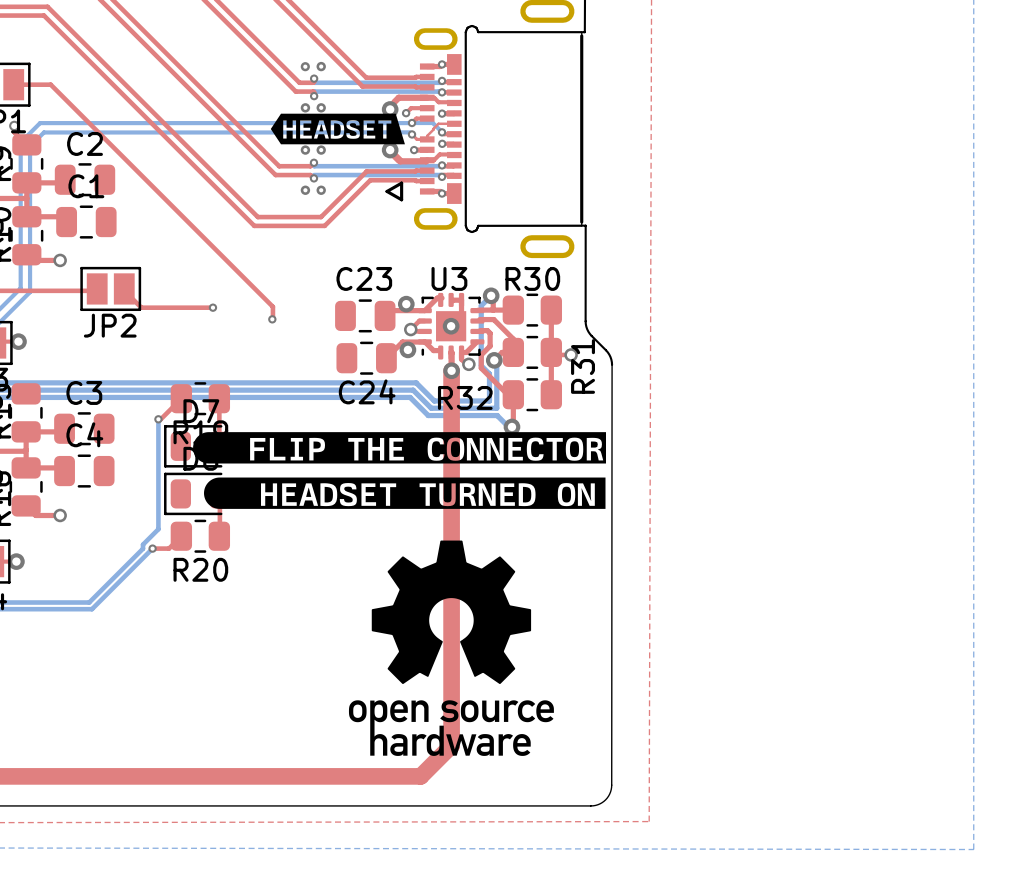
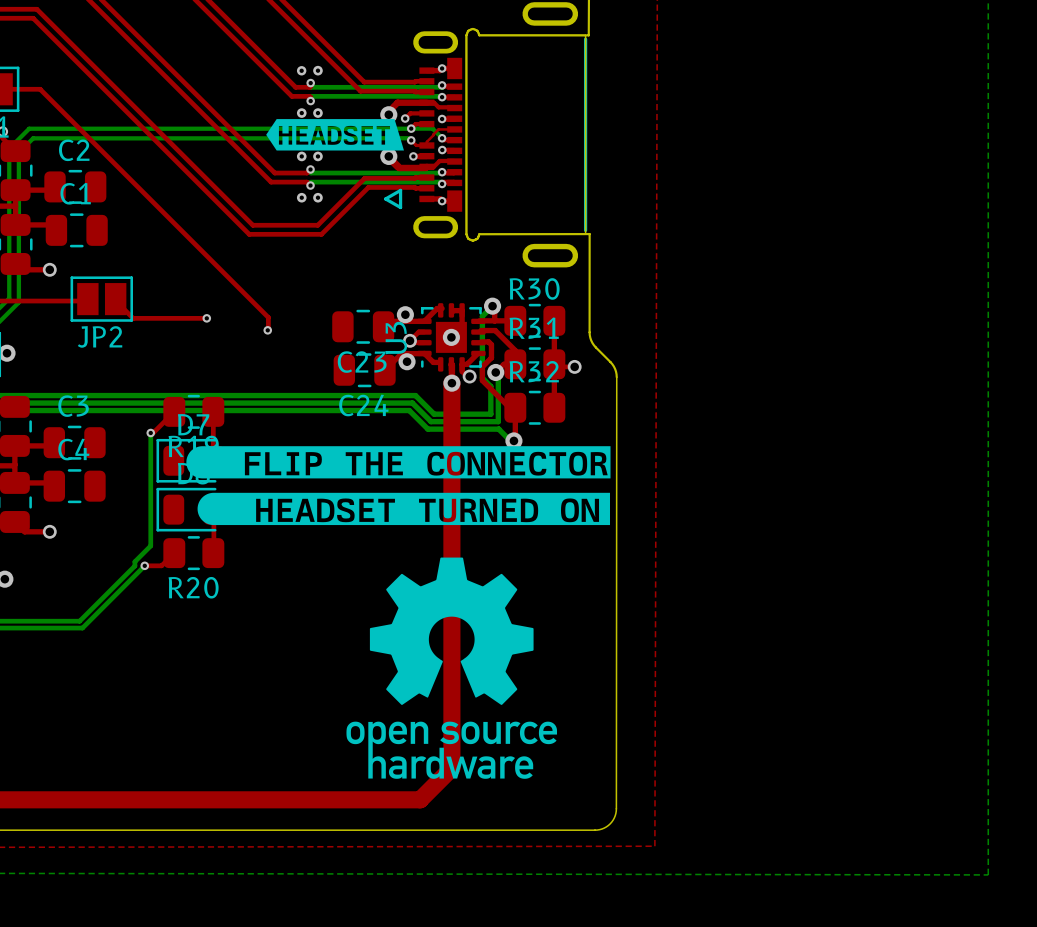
C23 name position: C23 (364, 278) -> C23 (362, 362)
U3 name rotation: 0° (449, 278) -> 90° counterclockwise (396, 338)
U3 name position: U3 (449, 278) -> U3 (396, 338)
R31 name rotation: 0° (583, 366) -> 90° clockwise (534, 328)
R32 name position: R32 (465, 397) -> R32 (534, 371)

